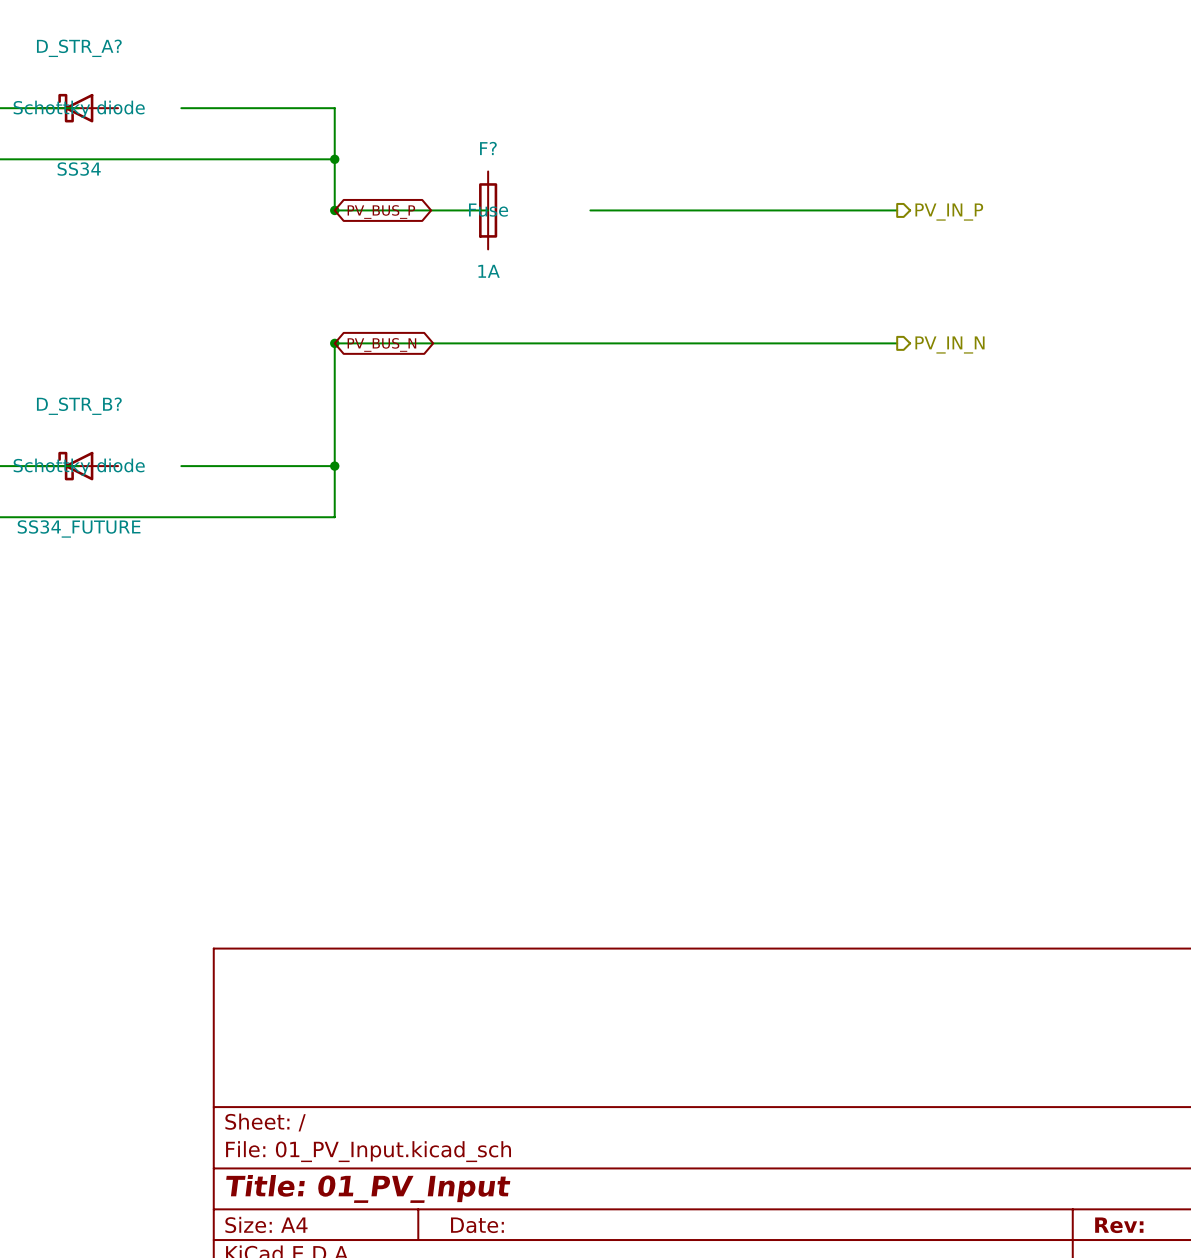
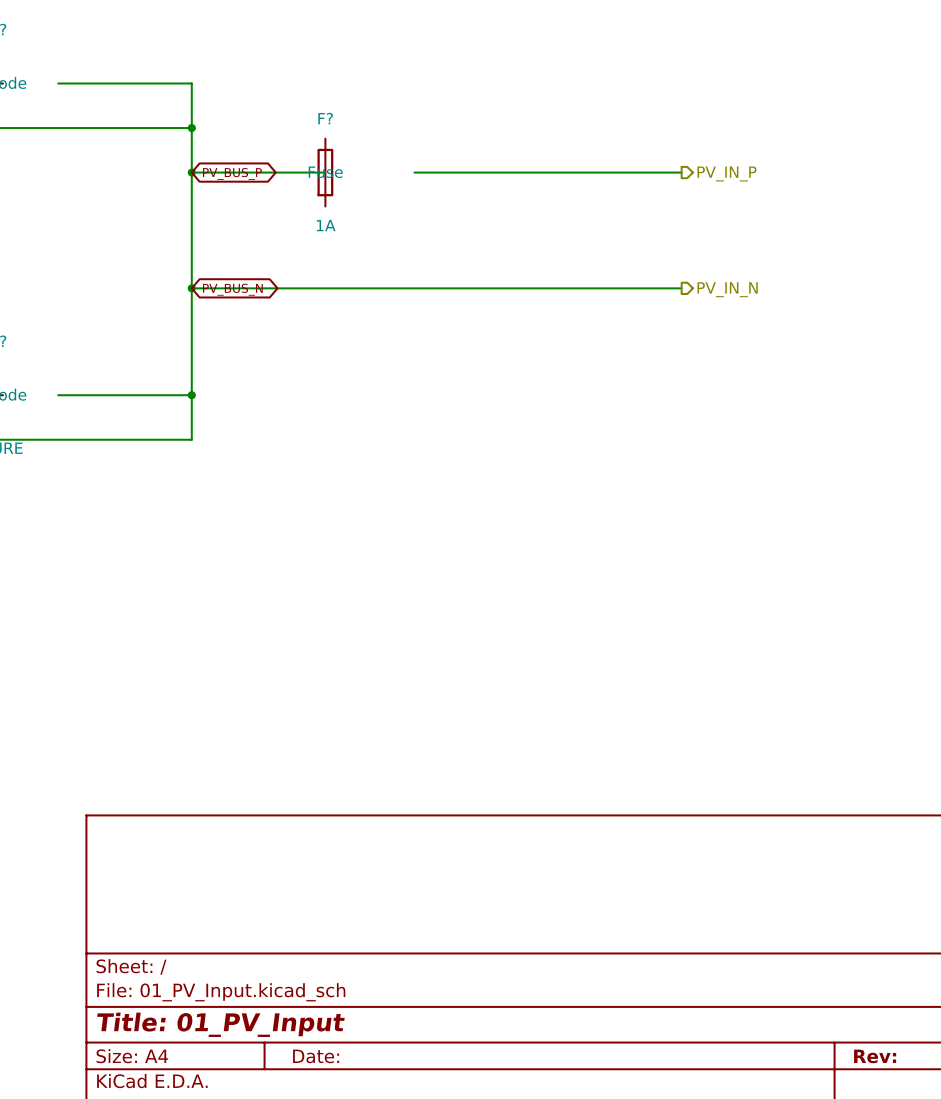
wire: none -> (191, 172) (191, 288)

